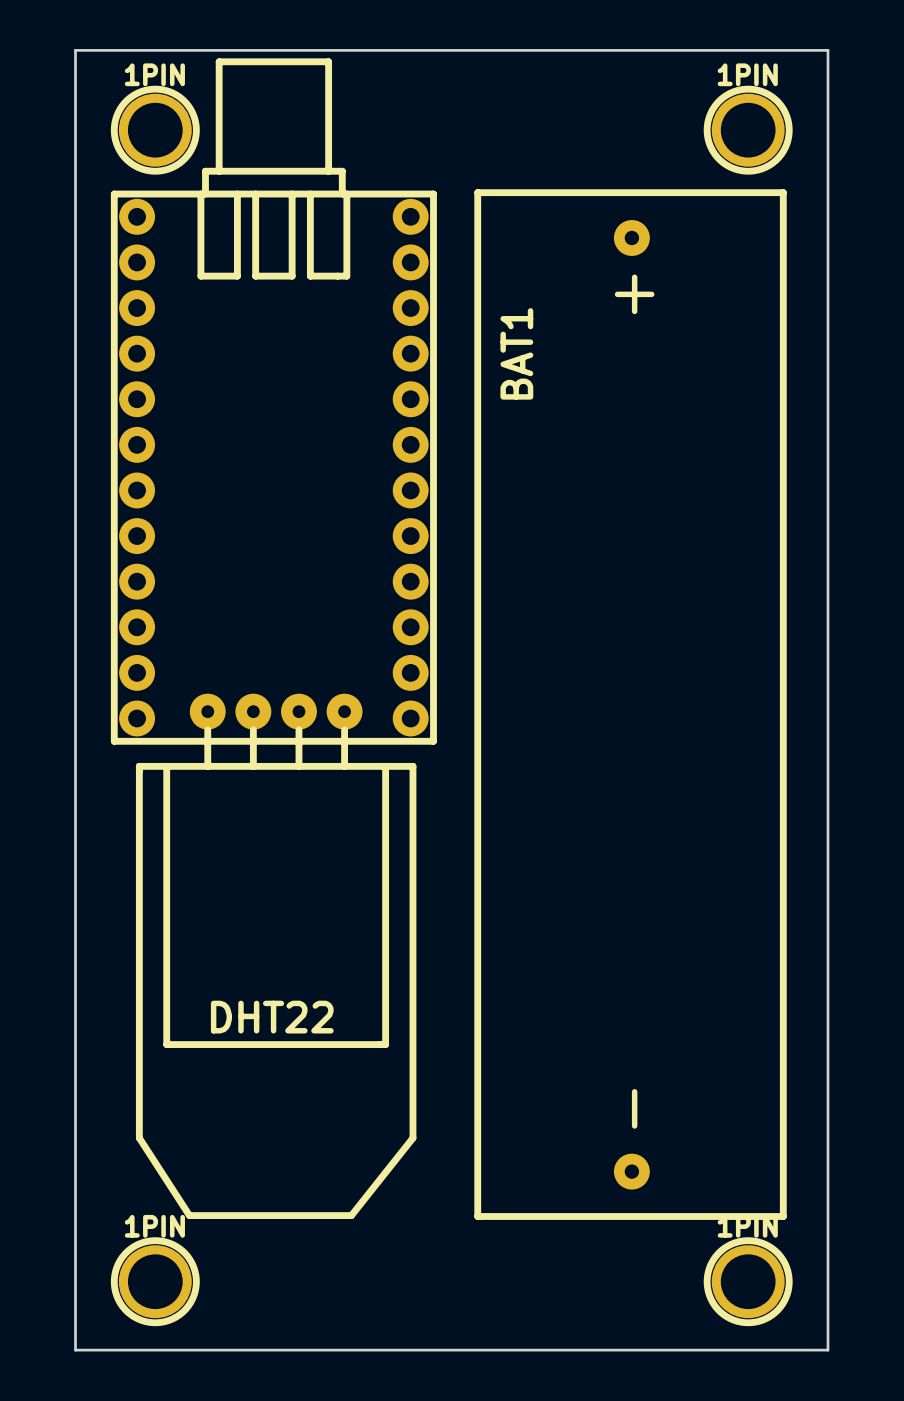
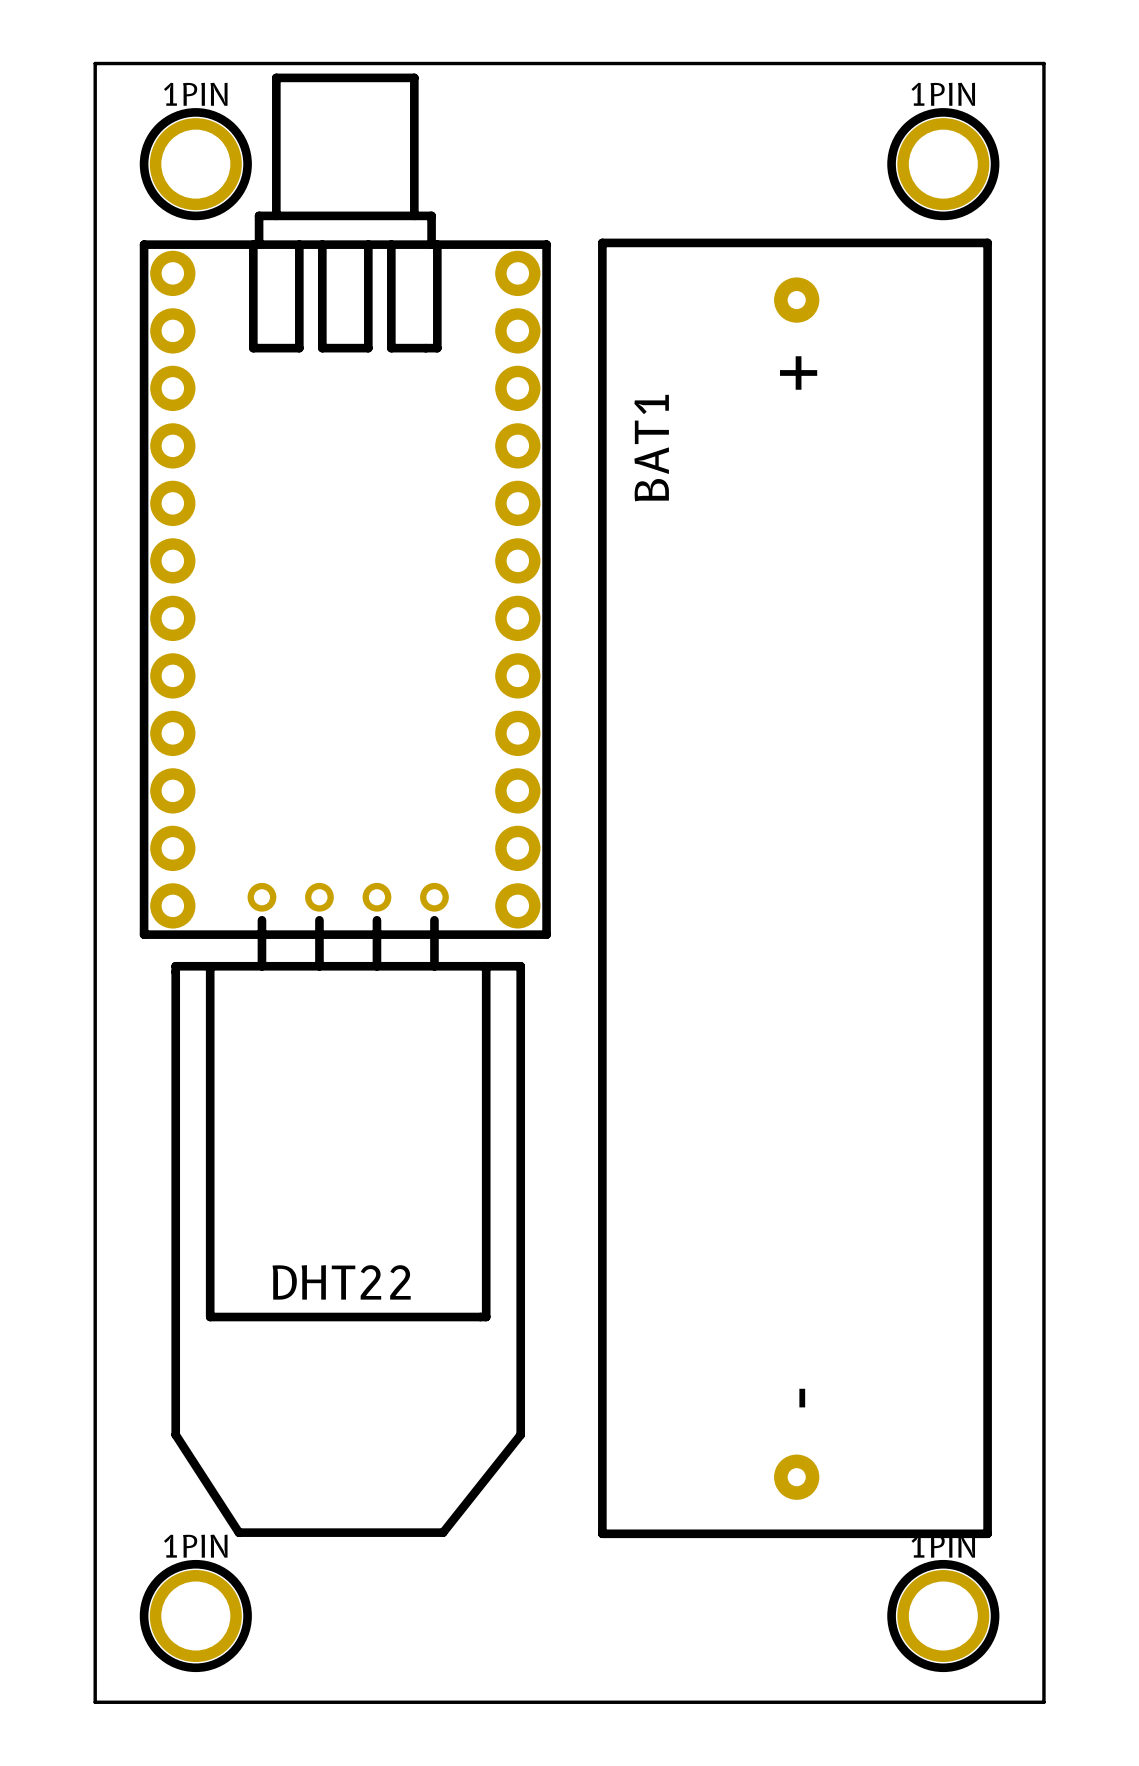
part footprint: [135, 693, 417, 1220] -> [171, 882, 526, 1537]

